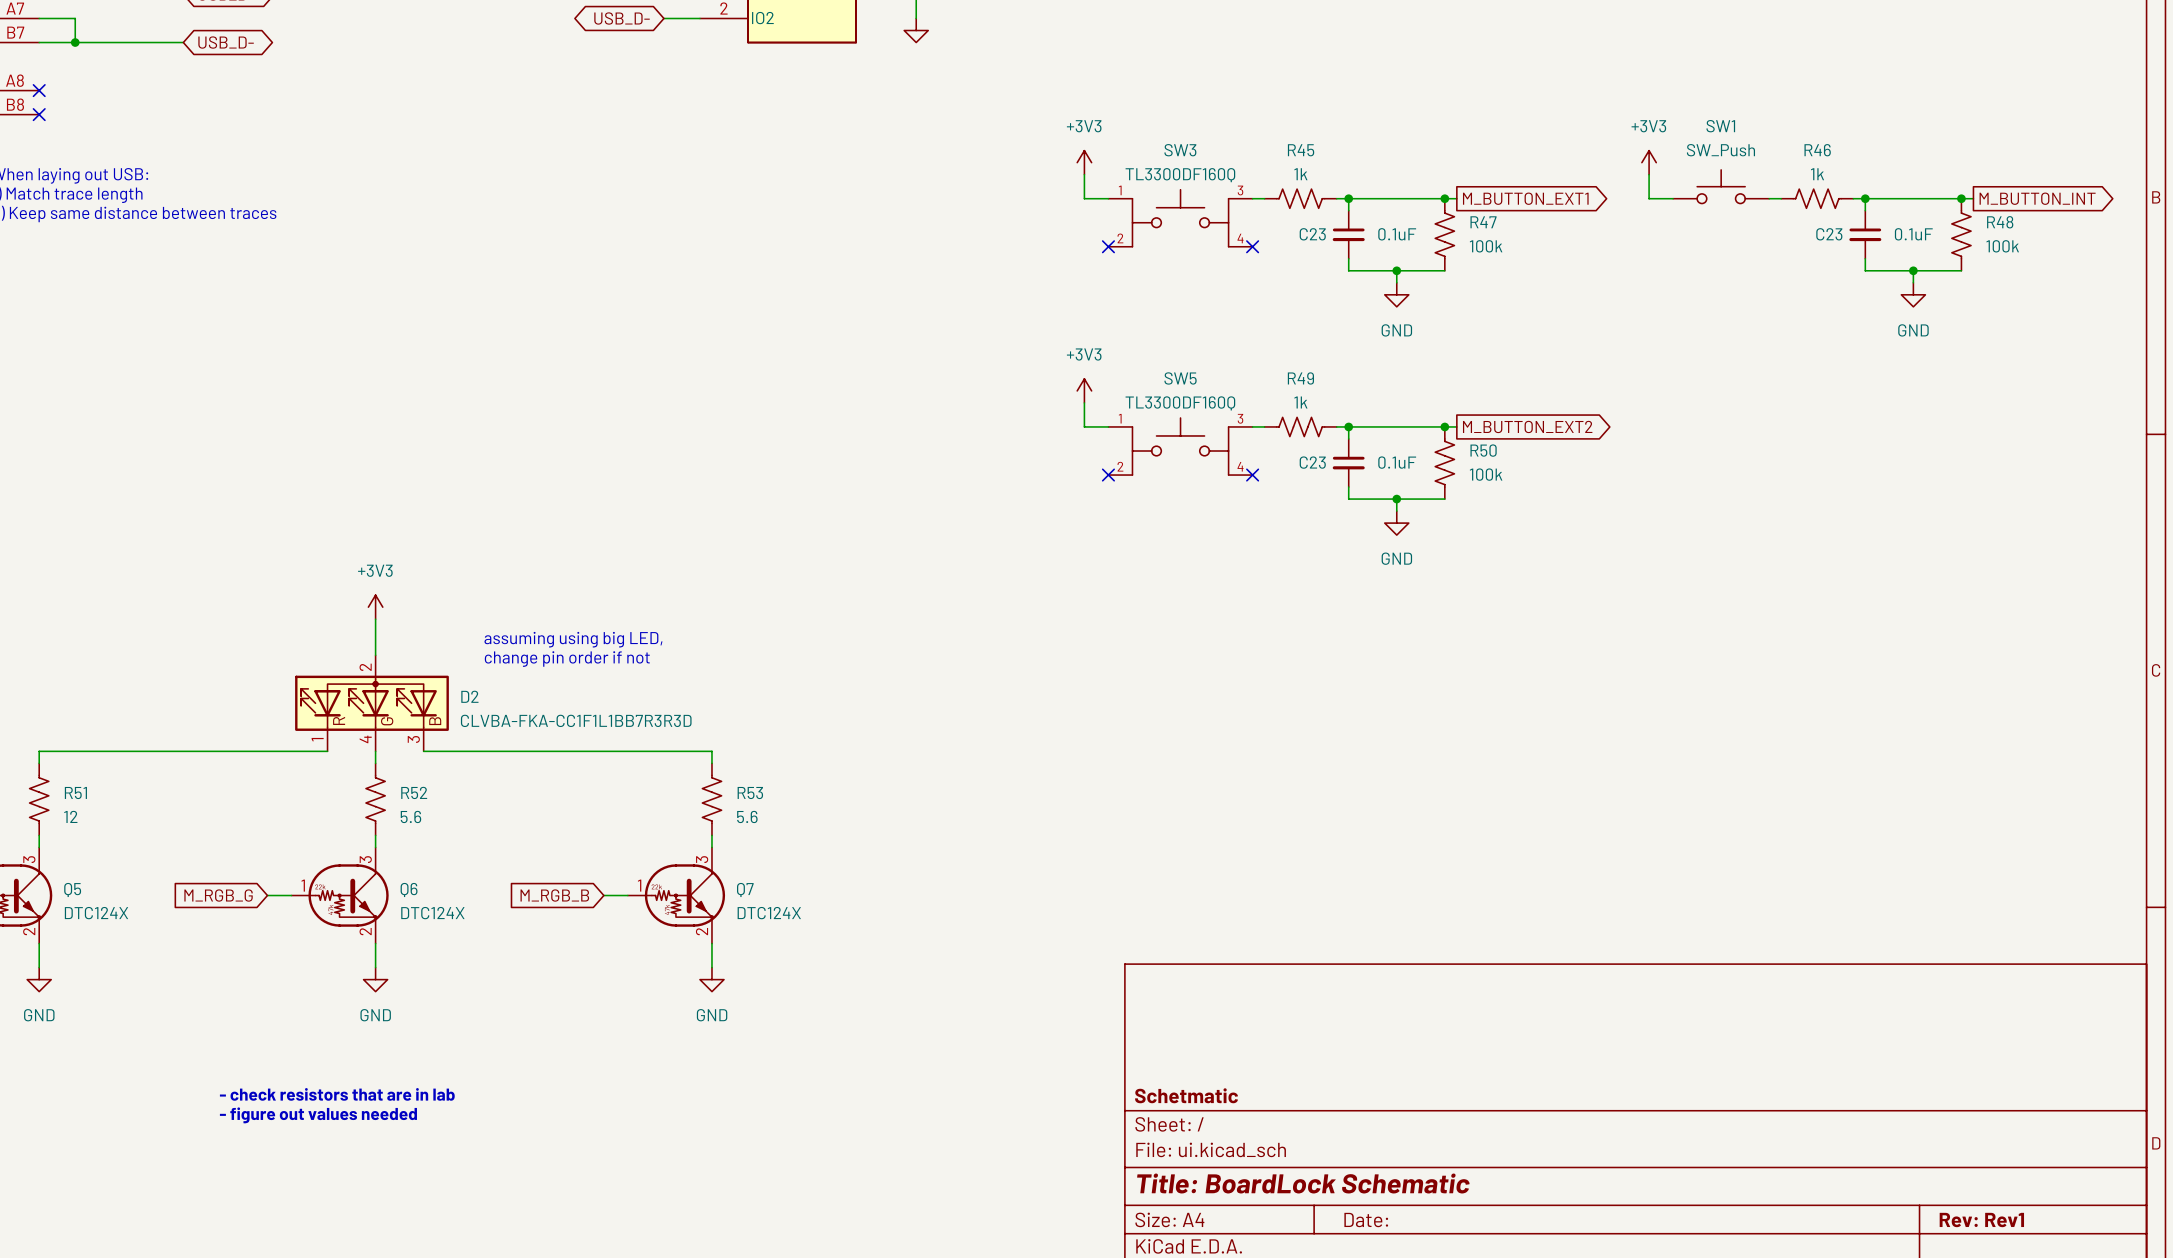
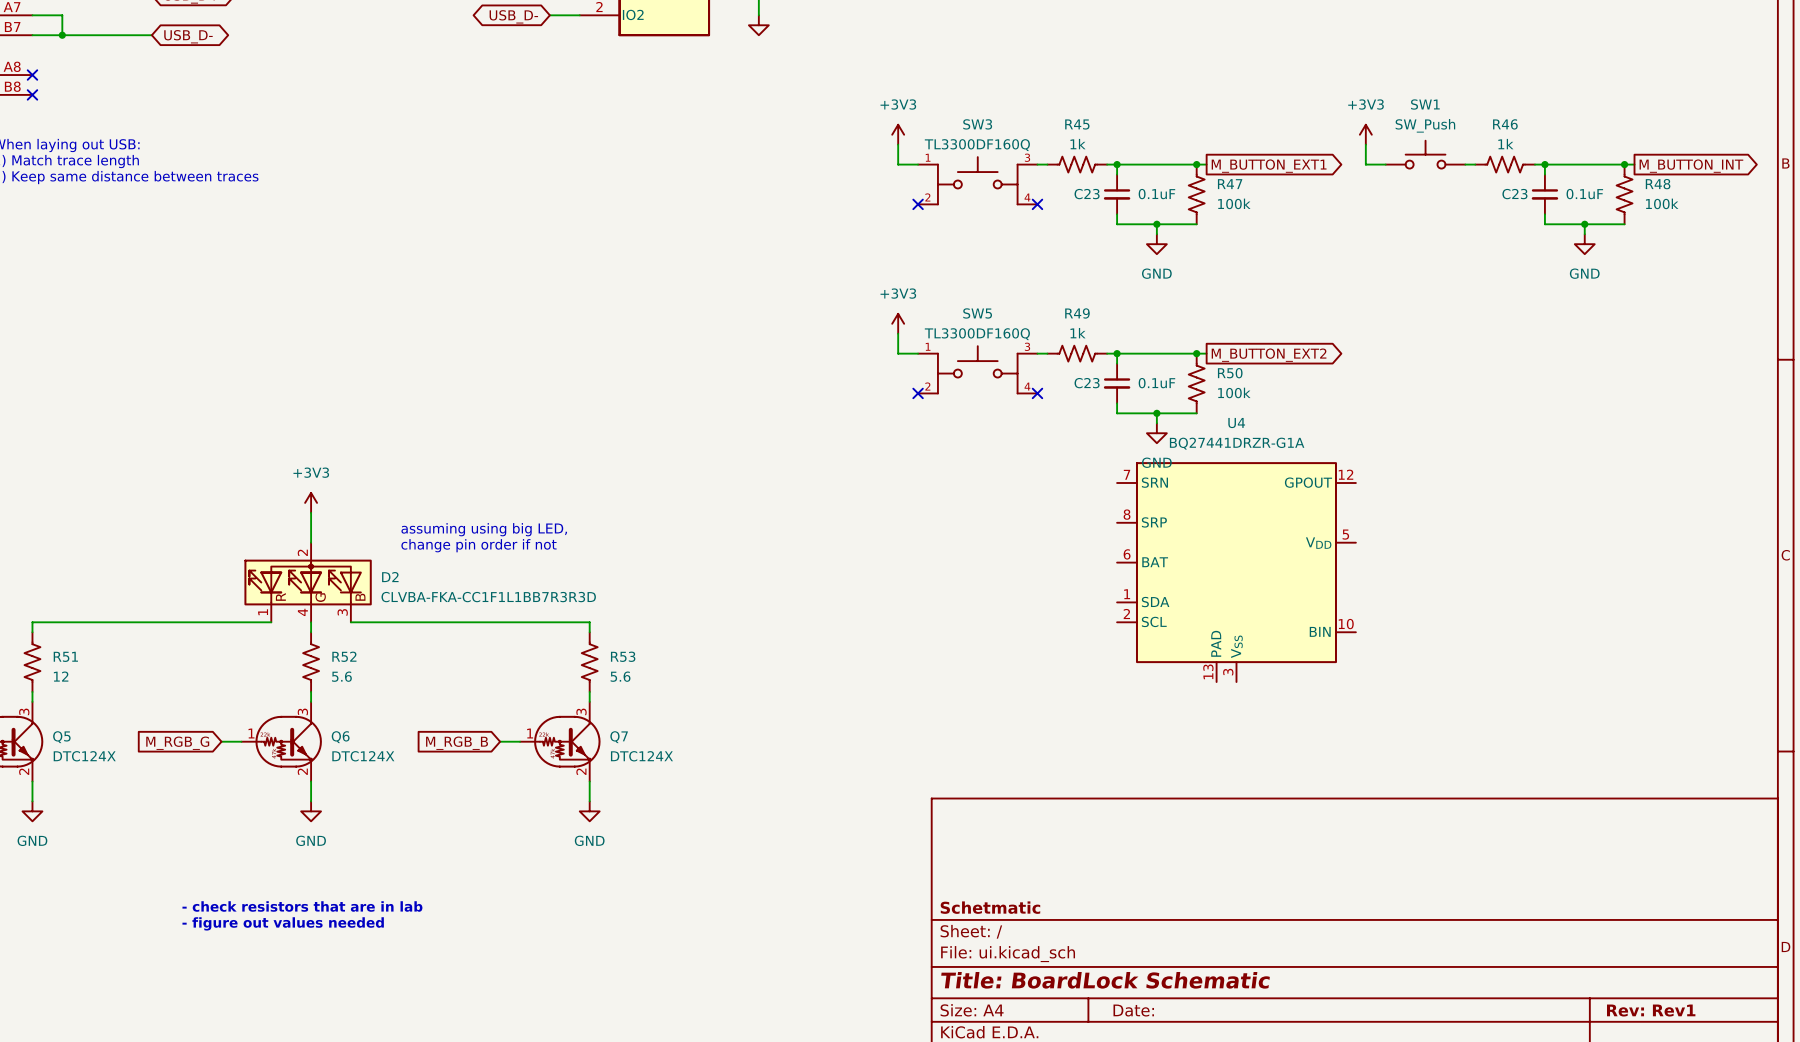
U4: none -> BQ27441DRZR-G1A (1236, 572)

